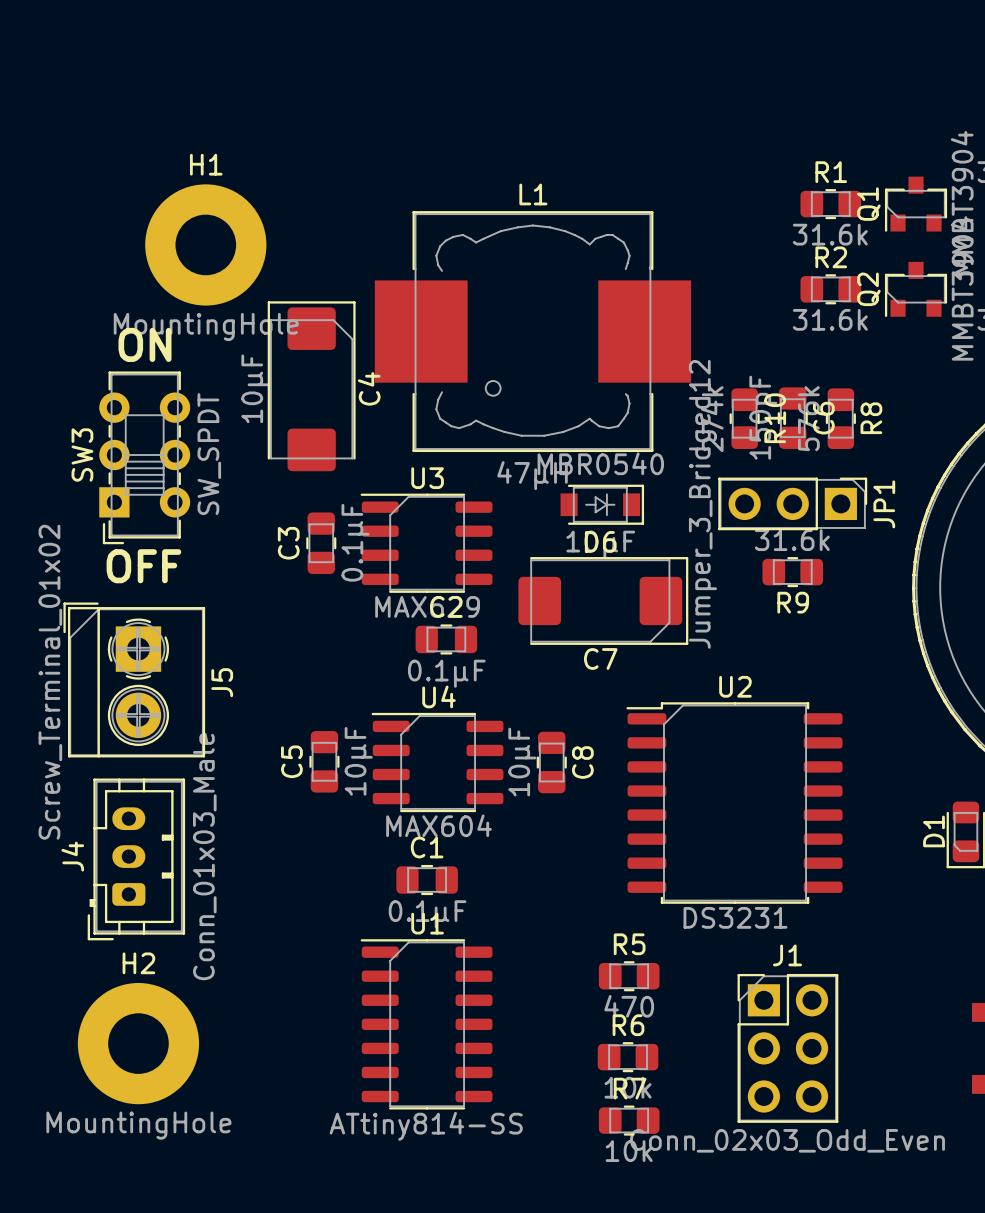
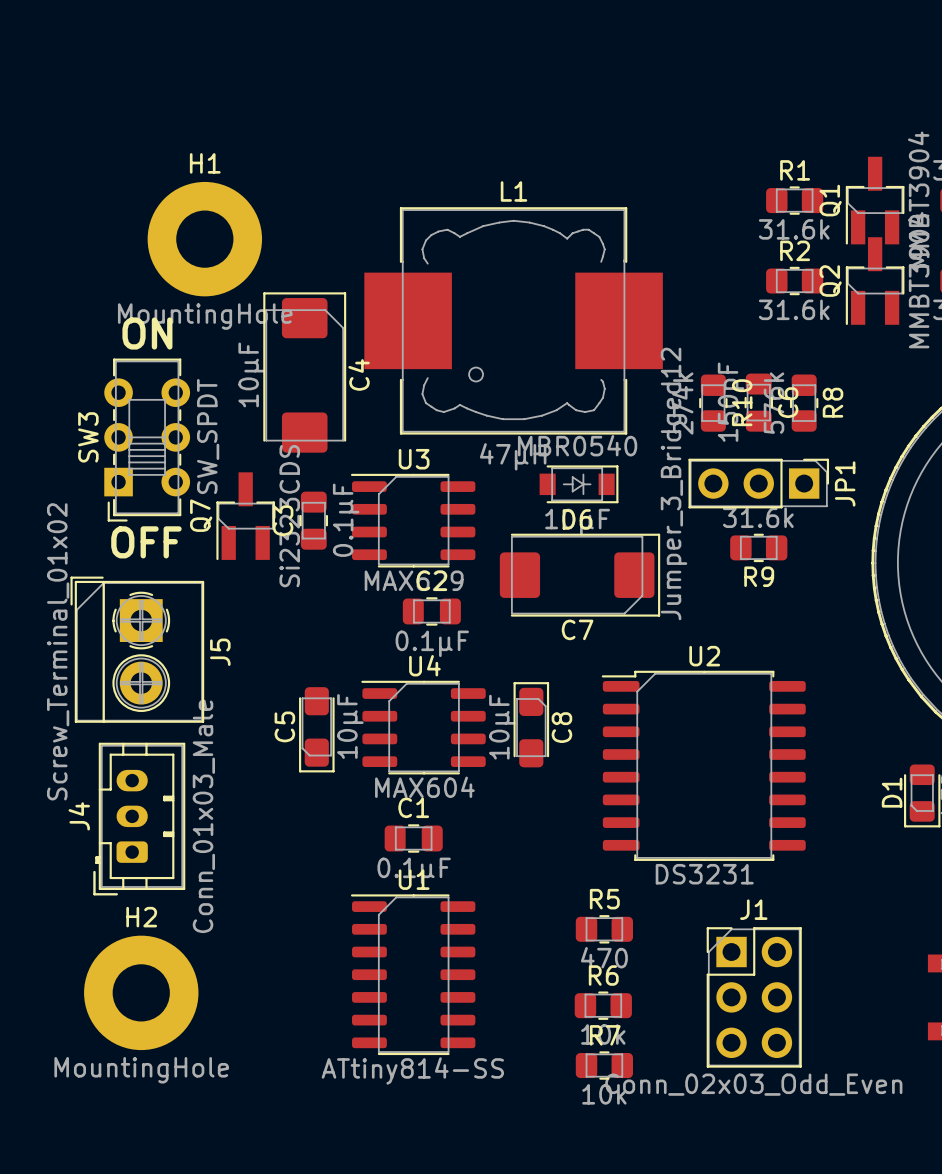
Q1 footprint: [884, 176, 948, 232] -> [845, 156, 905, 245]
Q2 footprint: [884, 261, 948, 317] -> [845, 237, 905, 325]
Q7: none -> Si2323CDS (245, 516)
C5 footprint: [309, 731, 340, 793] -> [299, 687, 335, 773]
C8 footprint: [536, 731, 567, 794] -> [513, 682, 550, 768]

